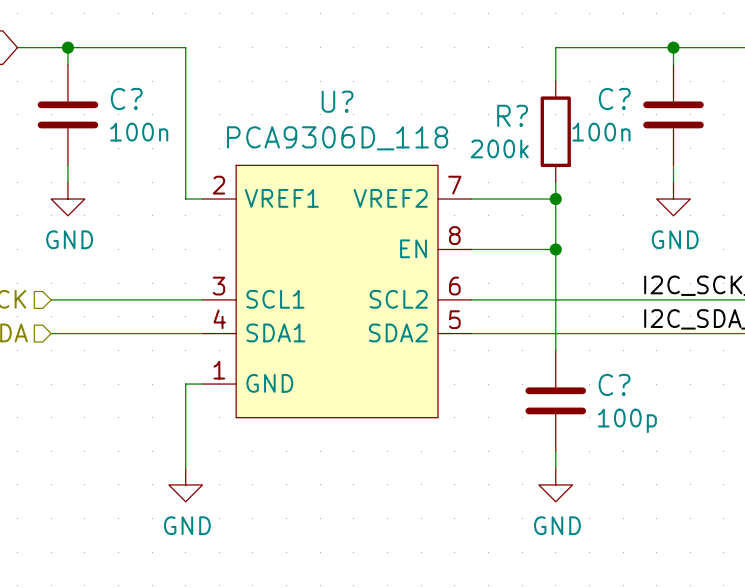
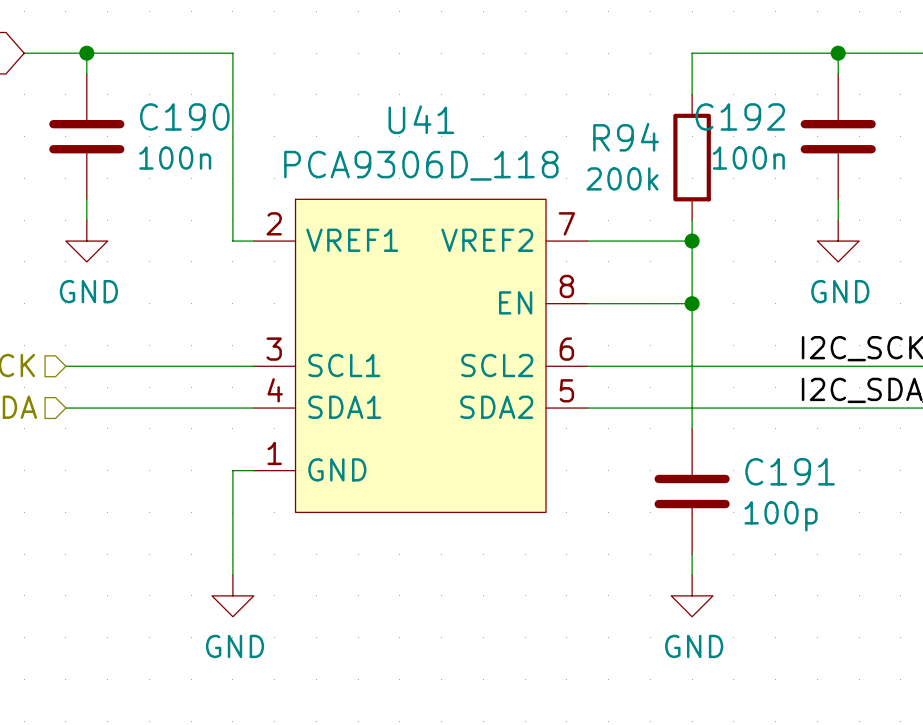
C? name: C? (126, 99) -> C190 (184, 116)
C? name: C? (614, 99) -> C192 (740, 116)
U? name: U? (337, 101) -> U41 (421, 119)
R? name: R? (512, 115) -> R94 (626, 137)
C? name: C? (614, 384) -> C191 (790, 471)

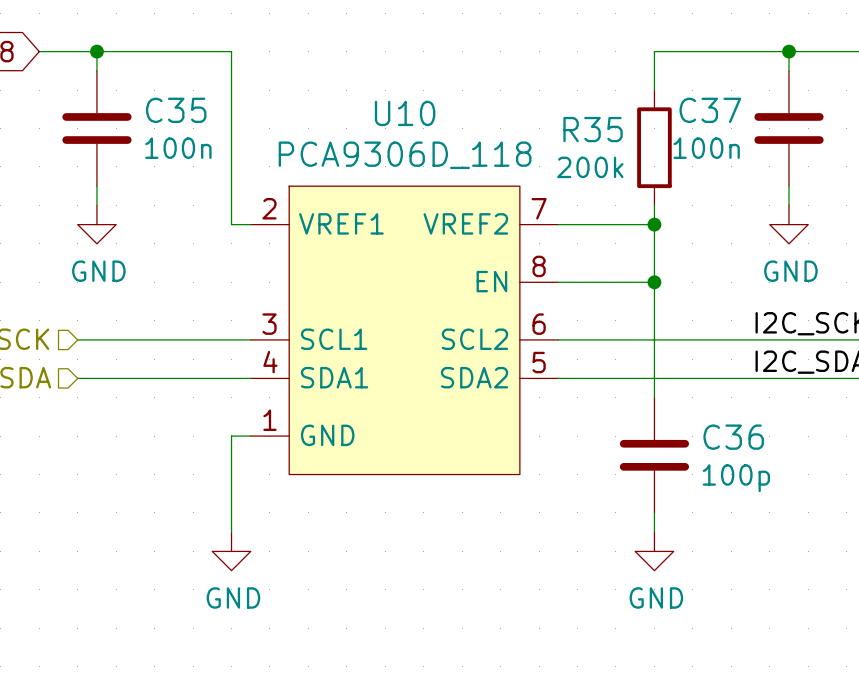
C190 name: C190 (184, 116) -> C35 (176, 110)
C192 name: C192 (740, 116) -> C37 (710, 110)
U41 name: U41 (421, 119) -> U10 (405, 113)
R94 name: R94 (626, 137) -> R35 (593, 129)
C191 name: C191 (790, 471) -> C36 (733, 437)

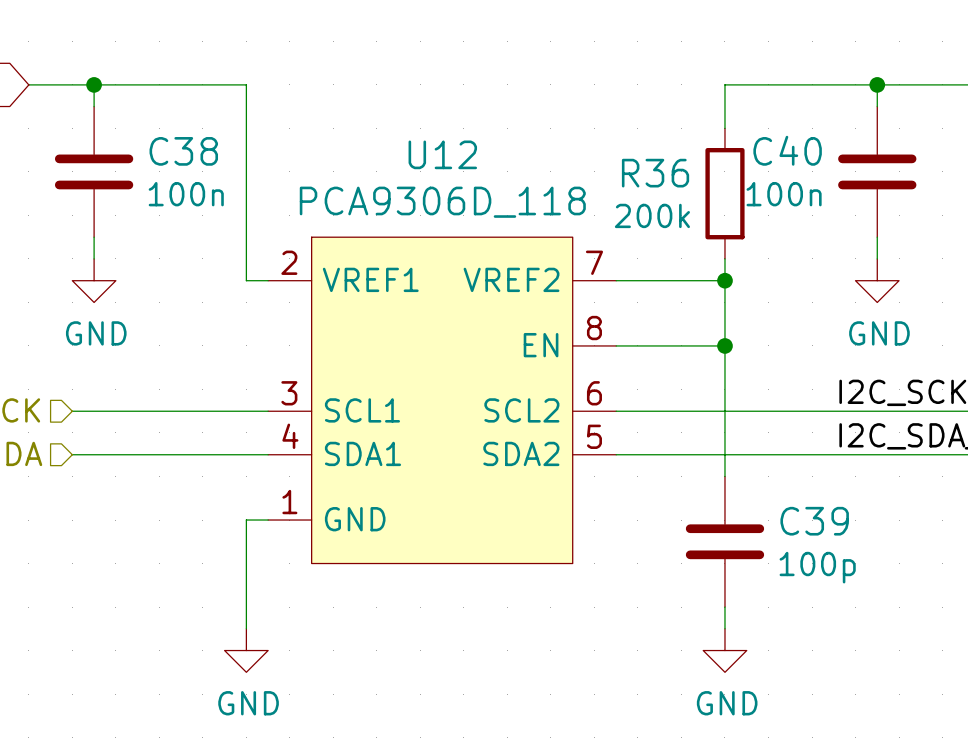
C35 name: C35 (176, 110) -> C38 (183, 151)
C37 name: C37 (710, 110) -> C40 (787, 150)
U10 name: U10 (405, 113) -> U12 (442, 154)
R35 name: R35 (593, 129) -> R36 (655, 173)
C36 name: C36 (733, 437) -> C39 (814, 521)

